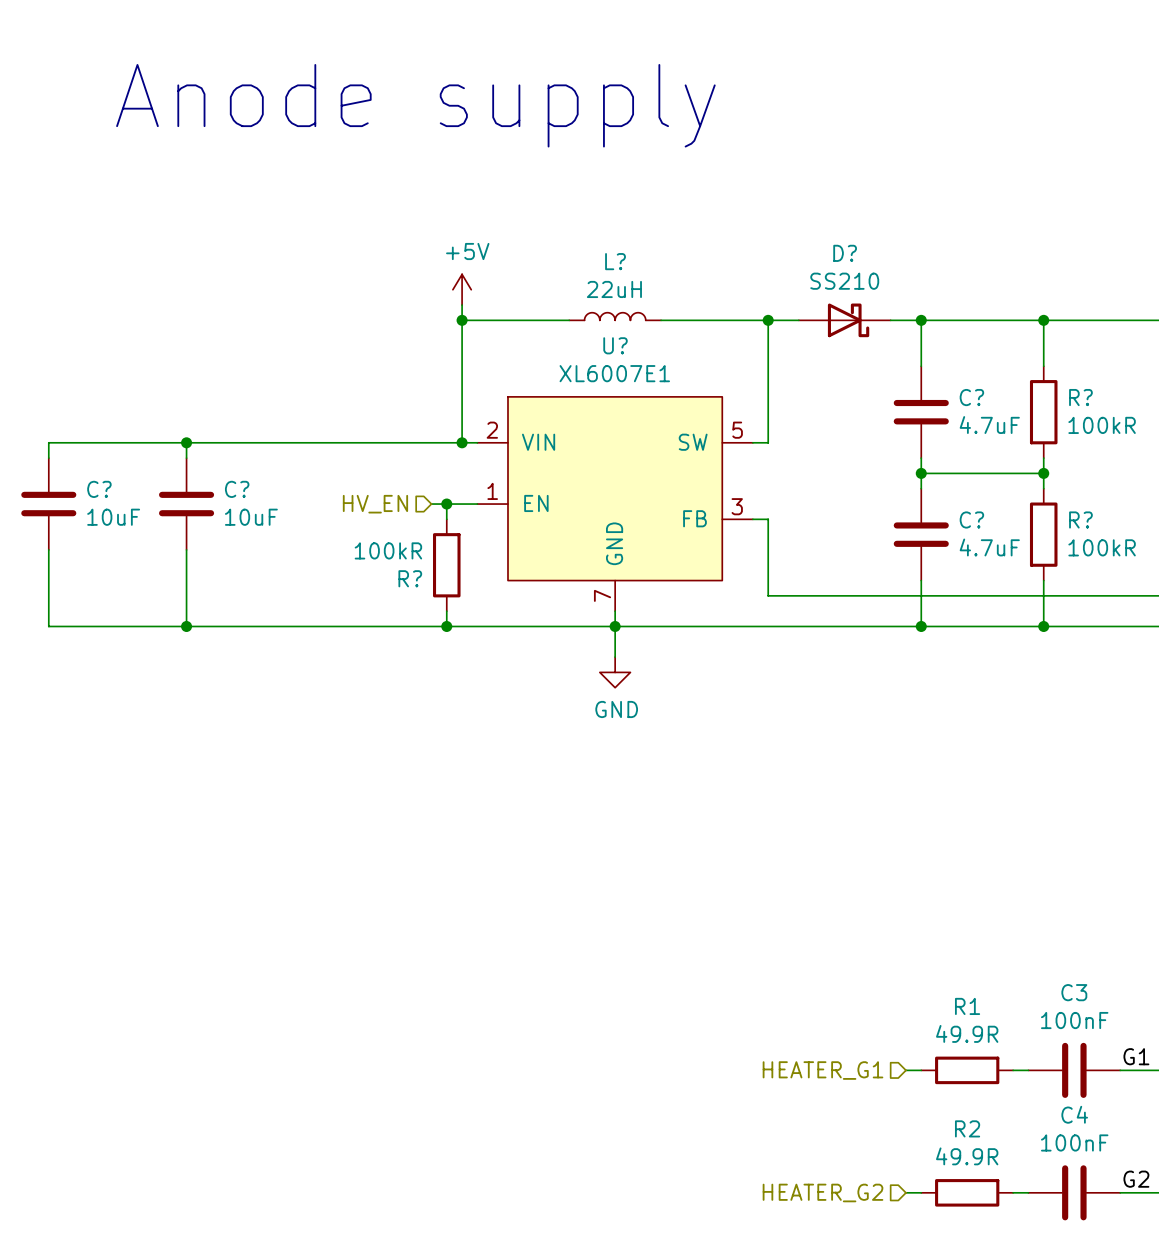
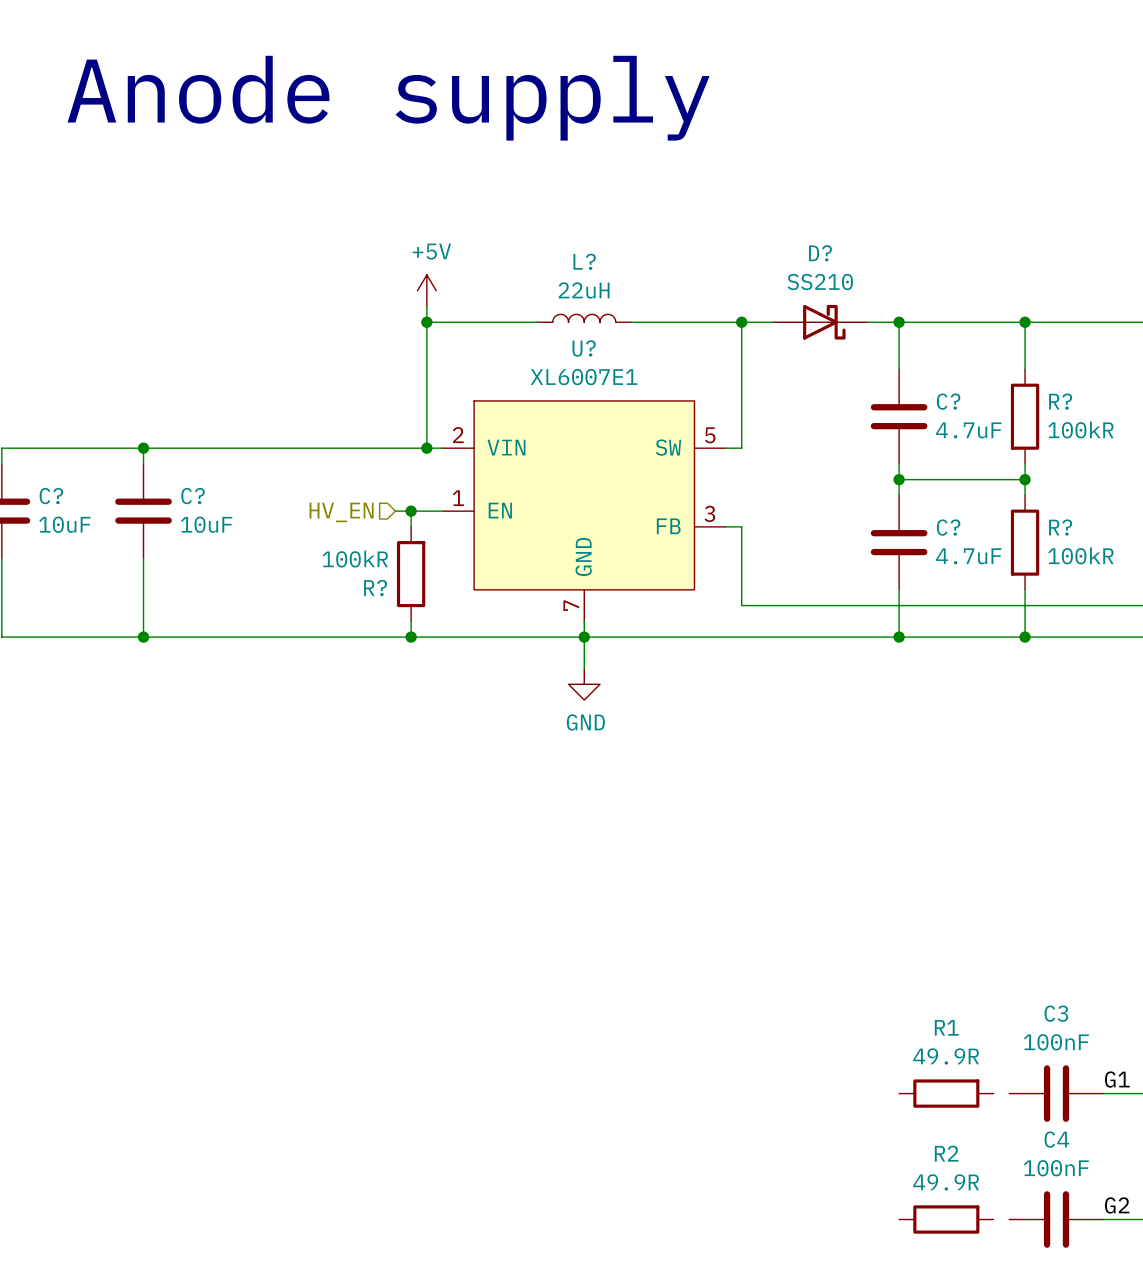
hierarchical label: HEATER_G1 (823, 1070) -> none
wire: (905, 1070) (921, 1070) -> none
wire: (1013, 1070) (1028, 1070) -> none
hierarchical label: HEATER_G2 (823, 1192) -> none
wire: (905, 1192) (921, 1192) -> none
wire: (1013, 1192) (1028, 1192) -> none

